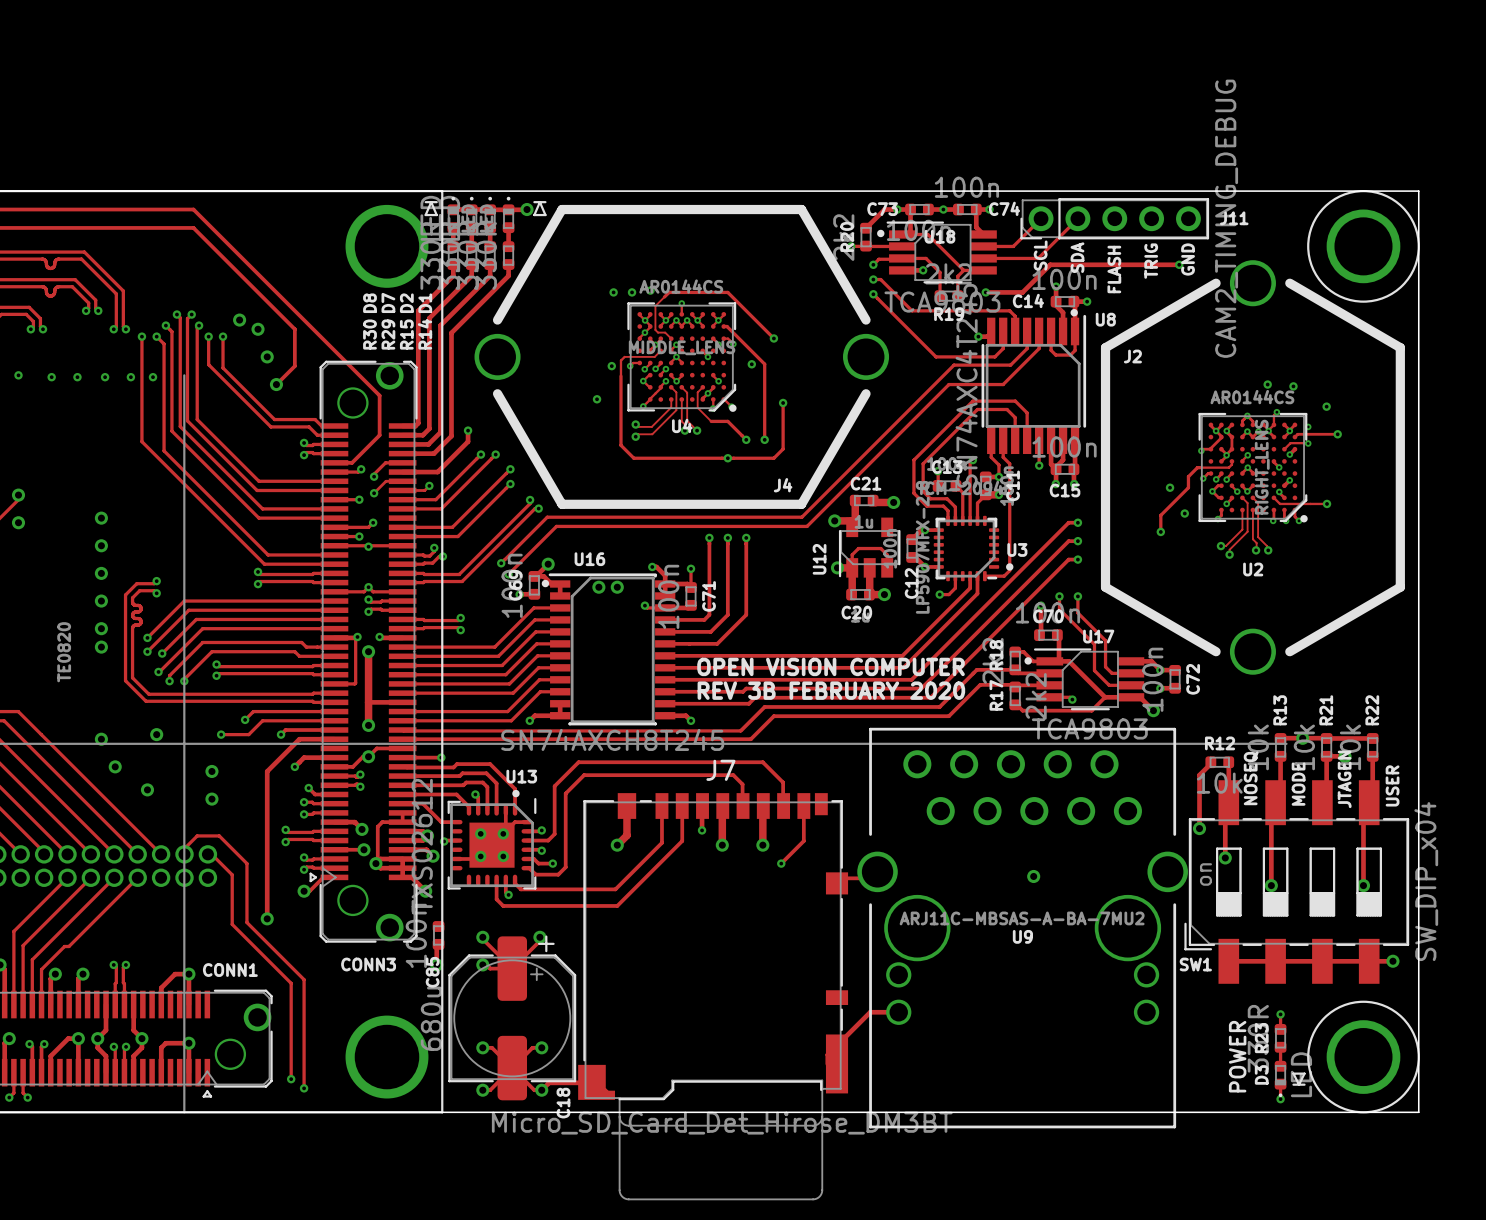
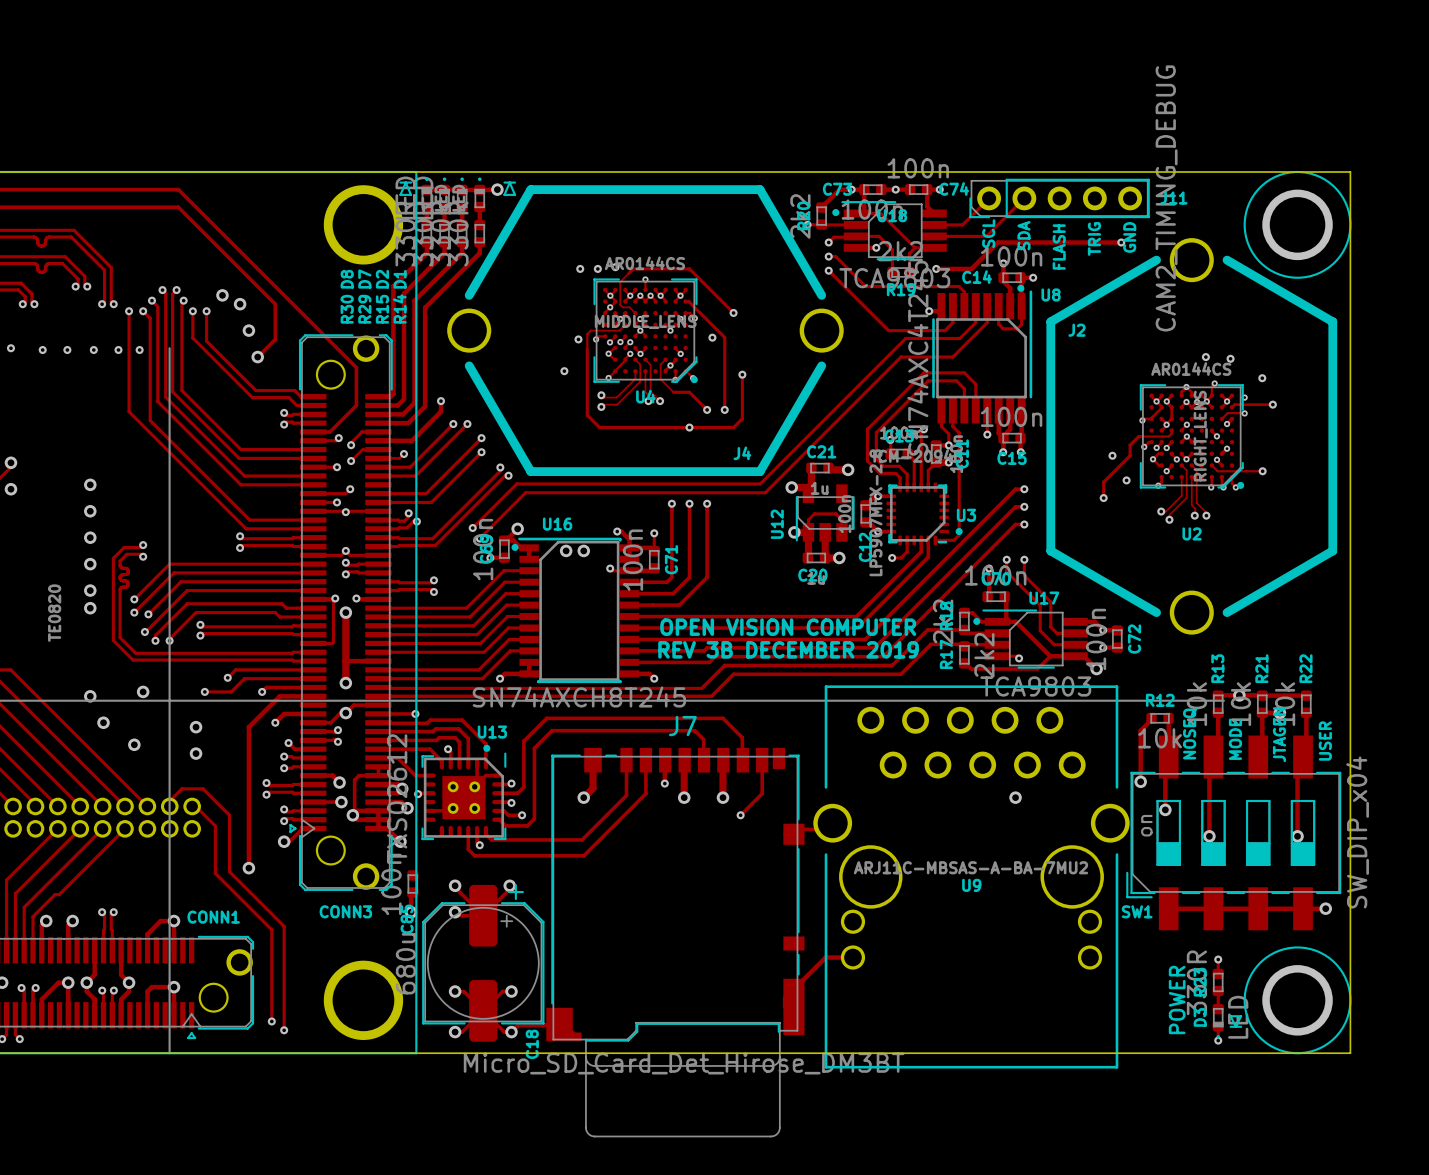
text: REV 3B FEBRUARY 2020 (831, 690) -> REV 3B DECEMBER 2019 (788, 649)
via position: (1033, 876) -> (1015, 797)

